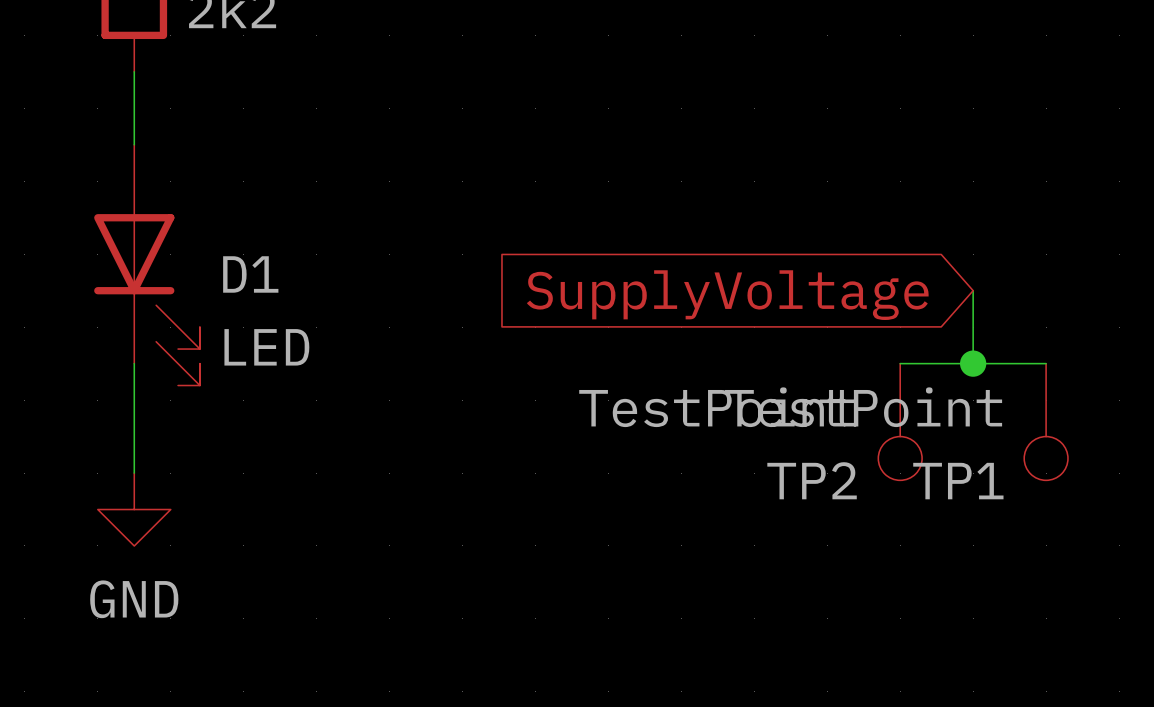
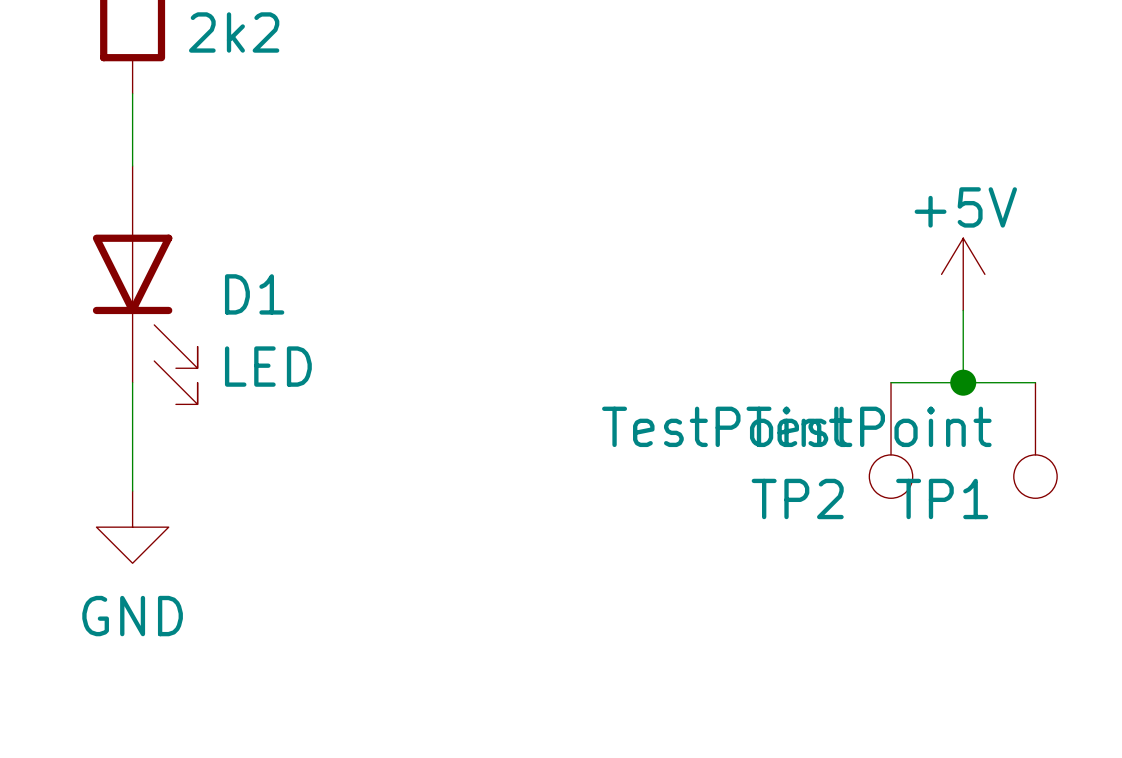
power symbol: none -> +5V (963, 274)
global label: SupplyVoltage (727, 295) -> none

